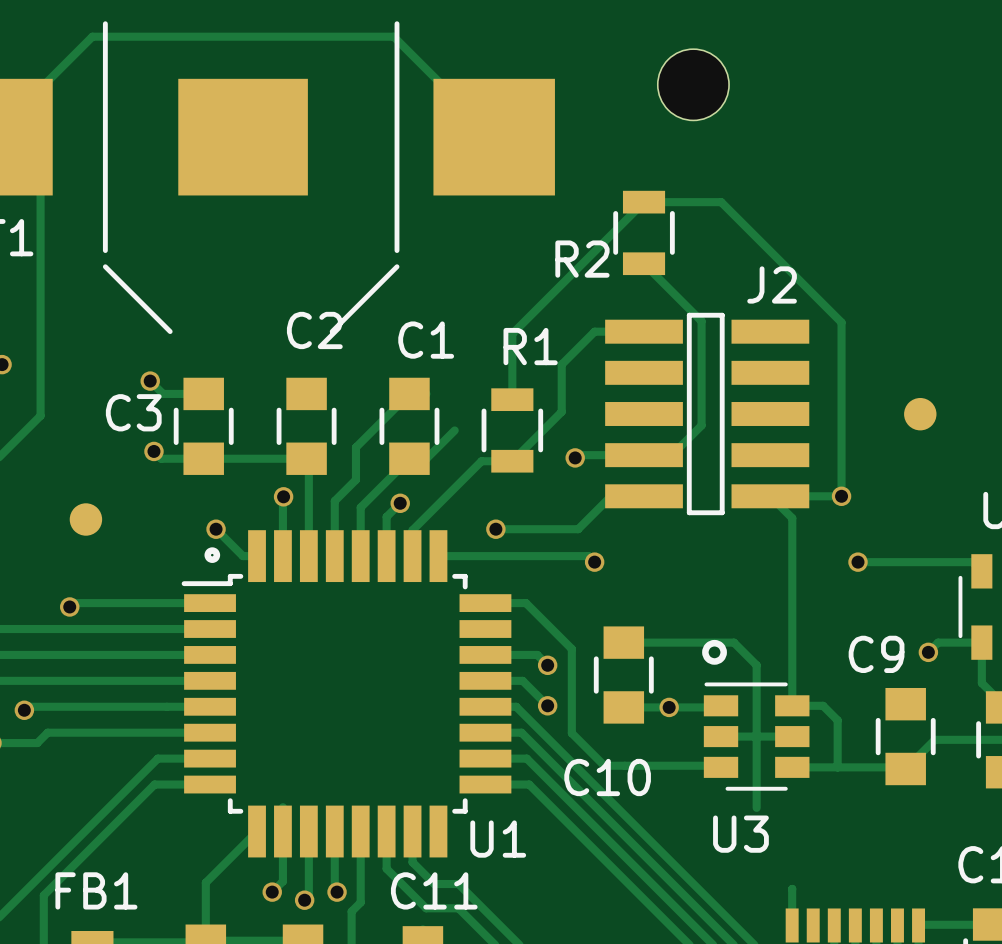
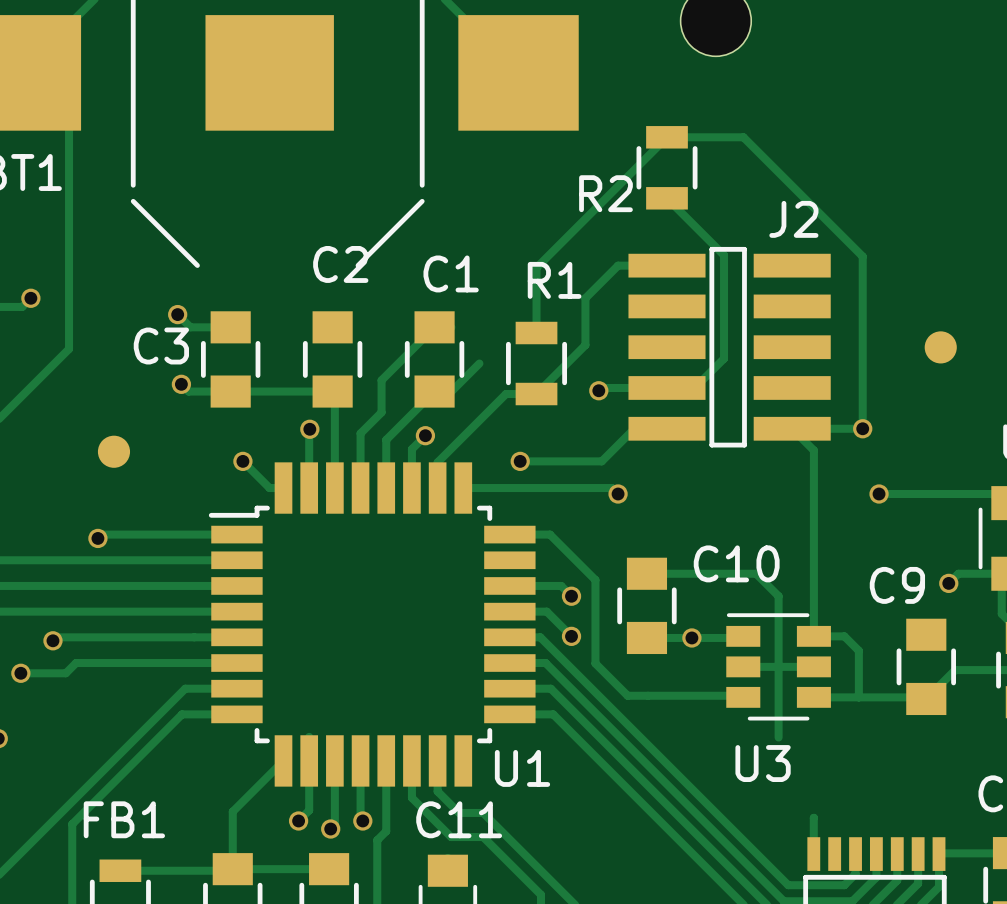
drawing: [204, 547, 221, 563] -> none
drawing: [702, 639, 727, 665] -> none
C10 name position: C10 (607, 777) -> C10 (736, 563)

